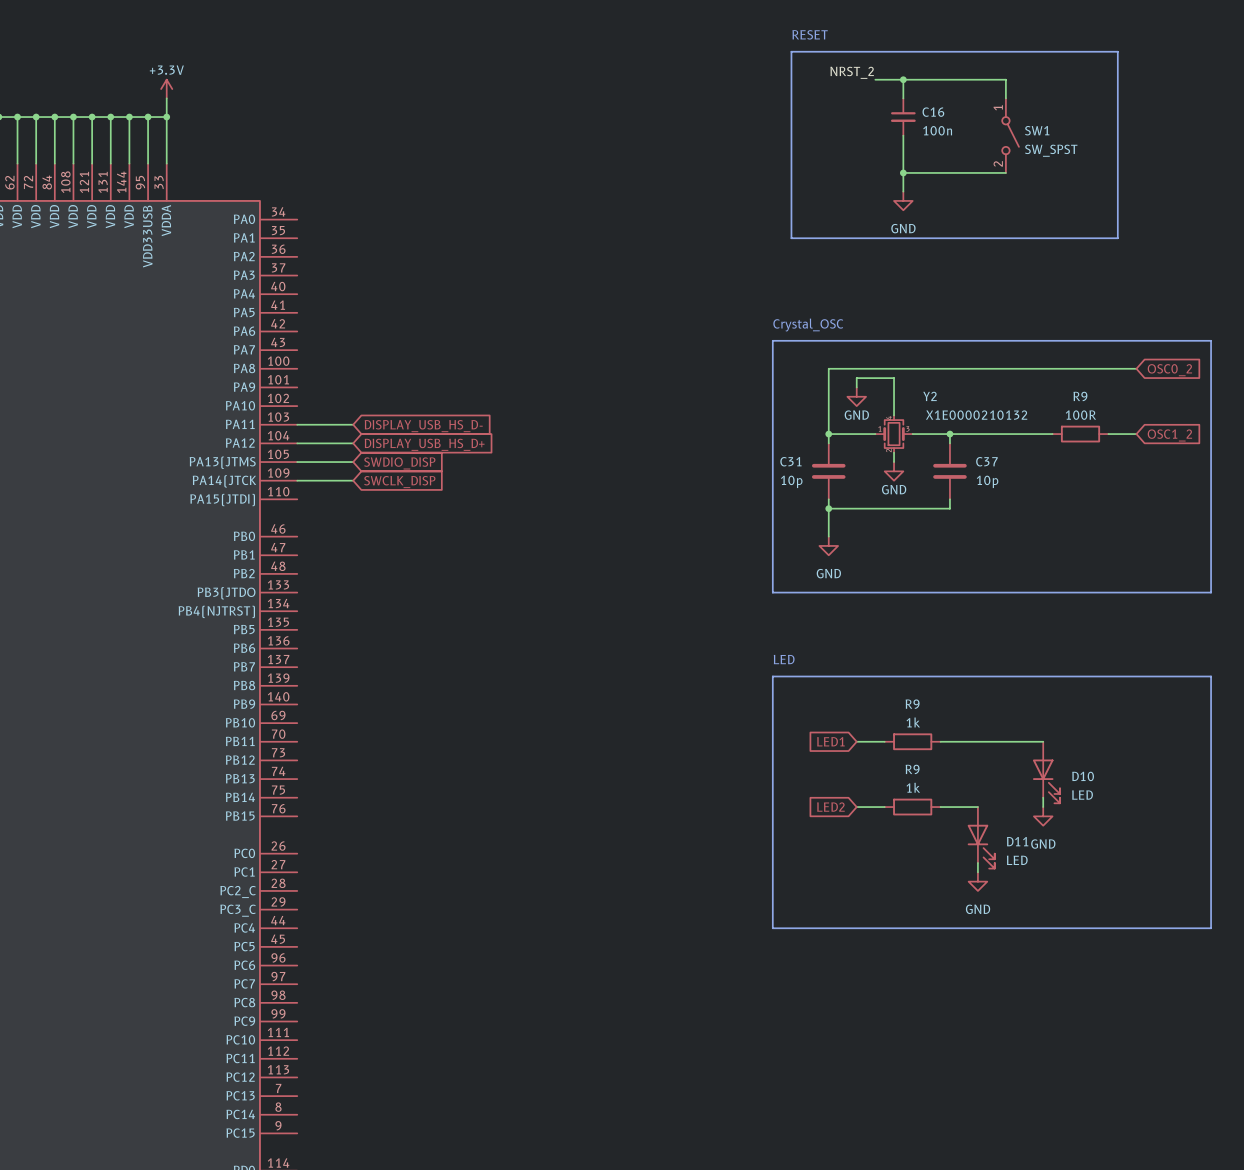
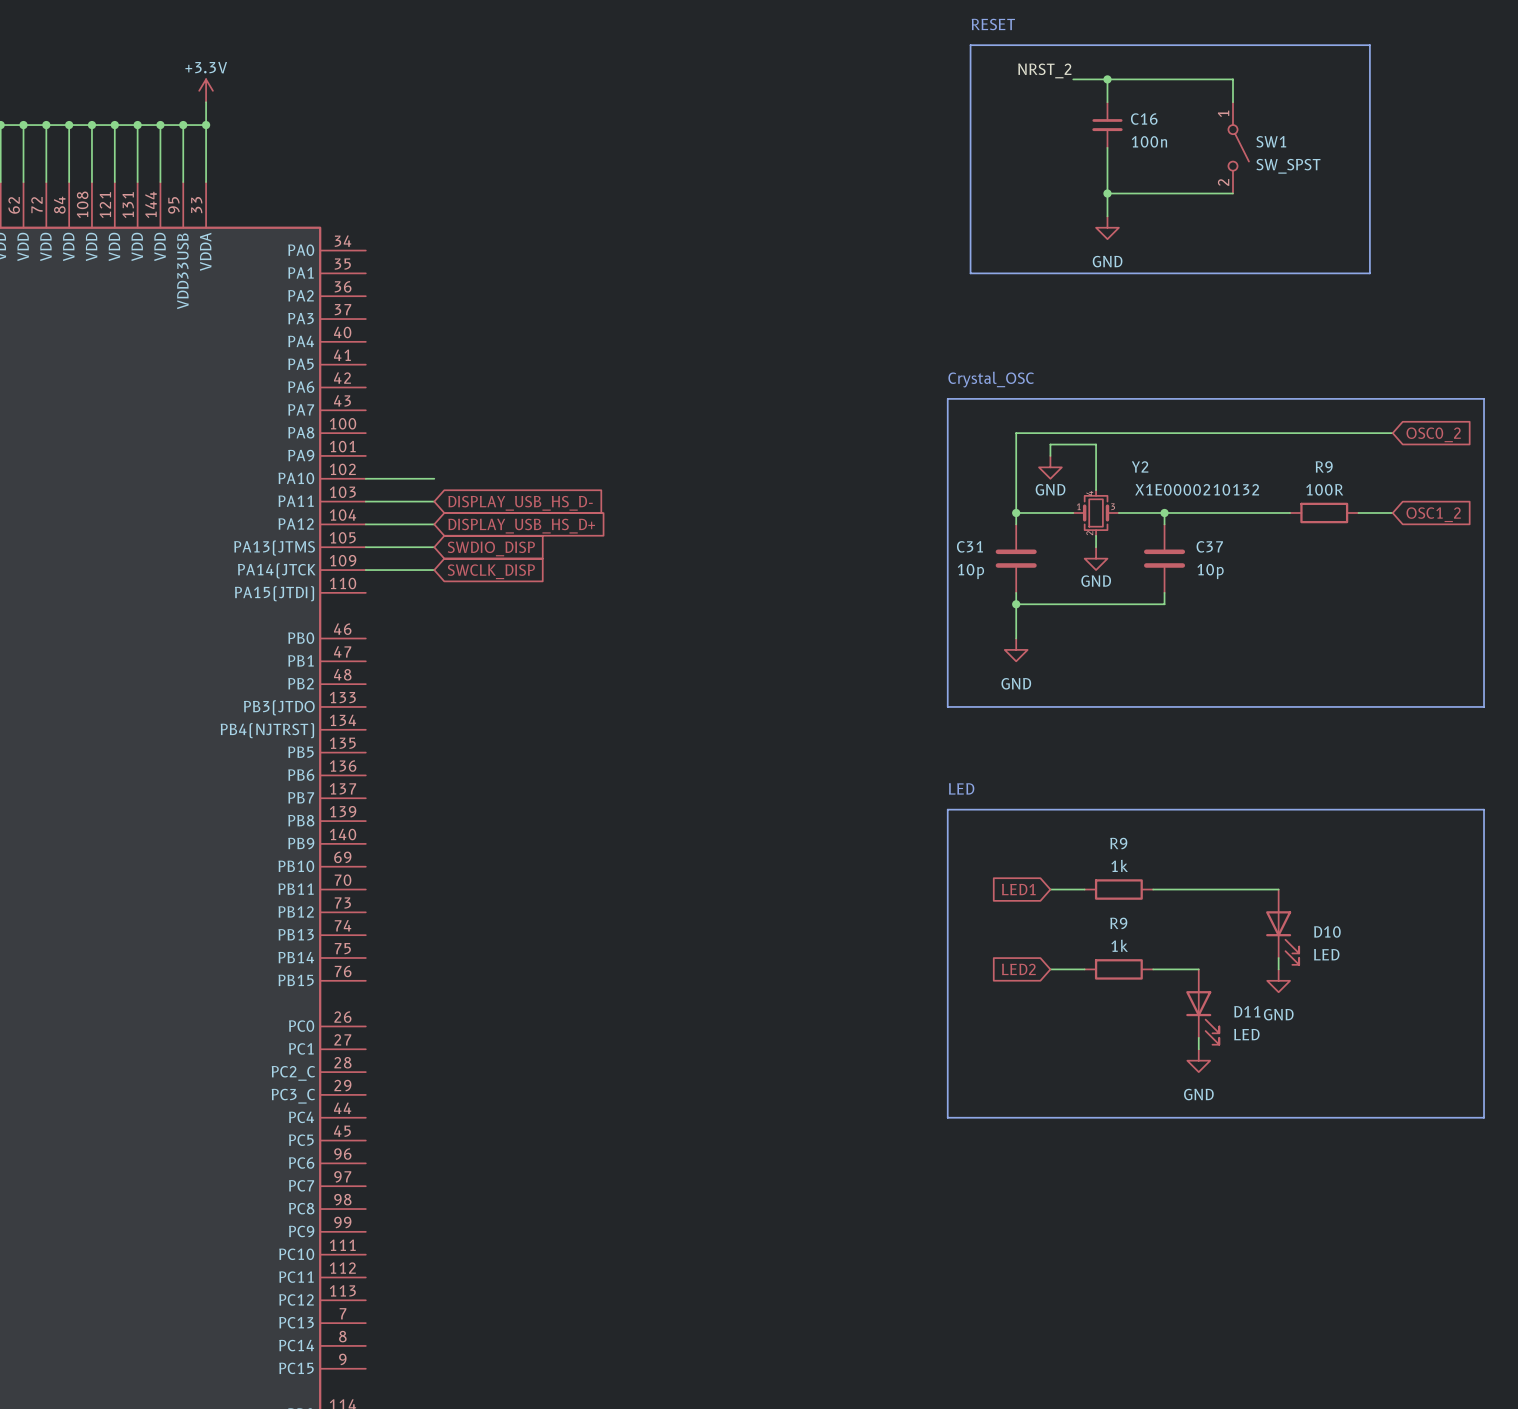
wire: none -> (365, 478) (434, 478)

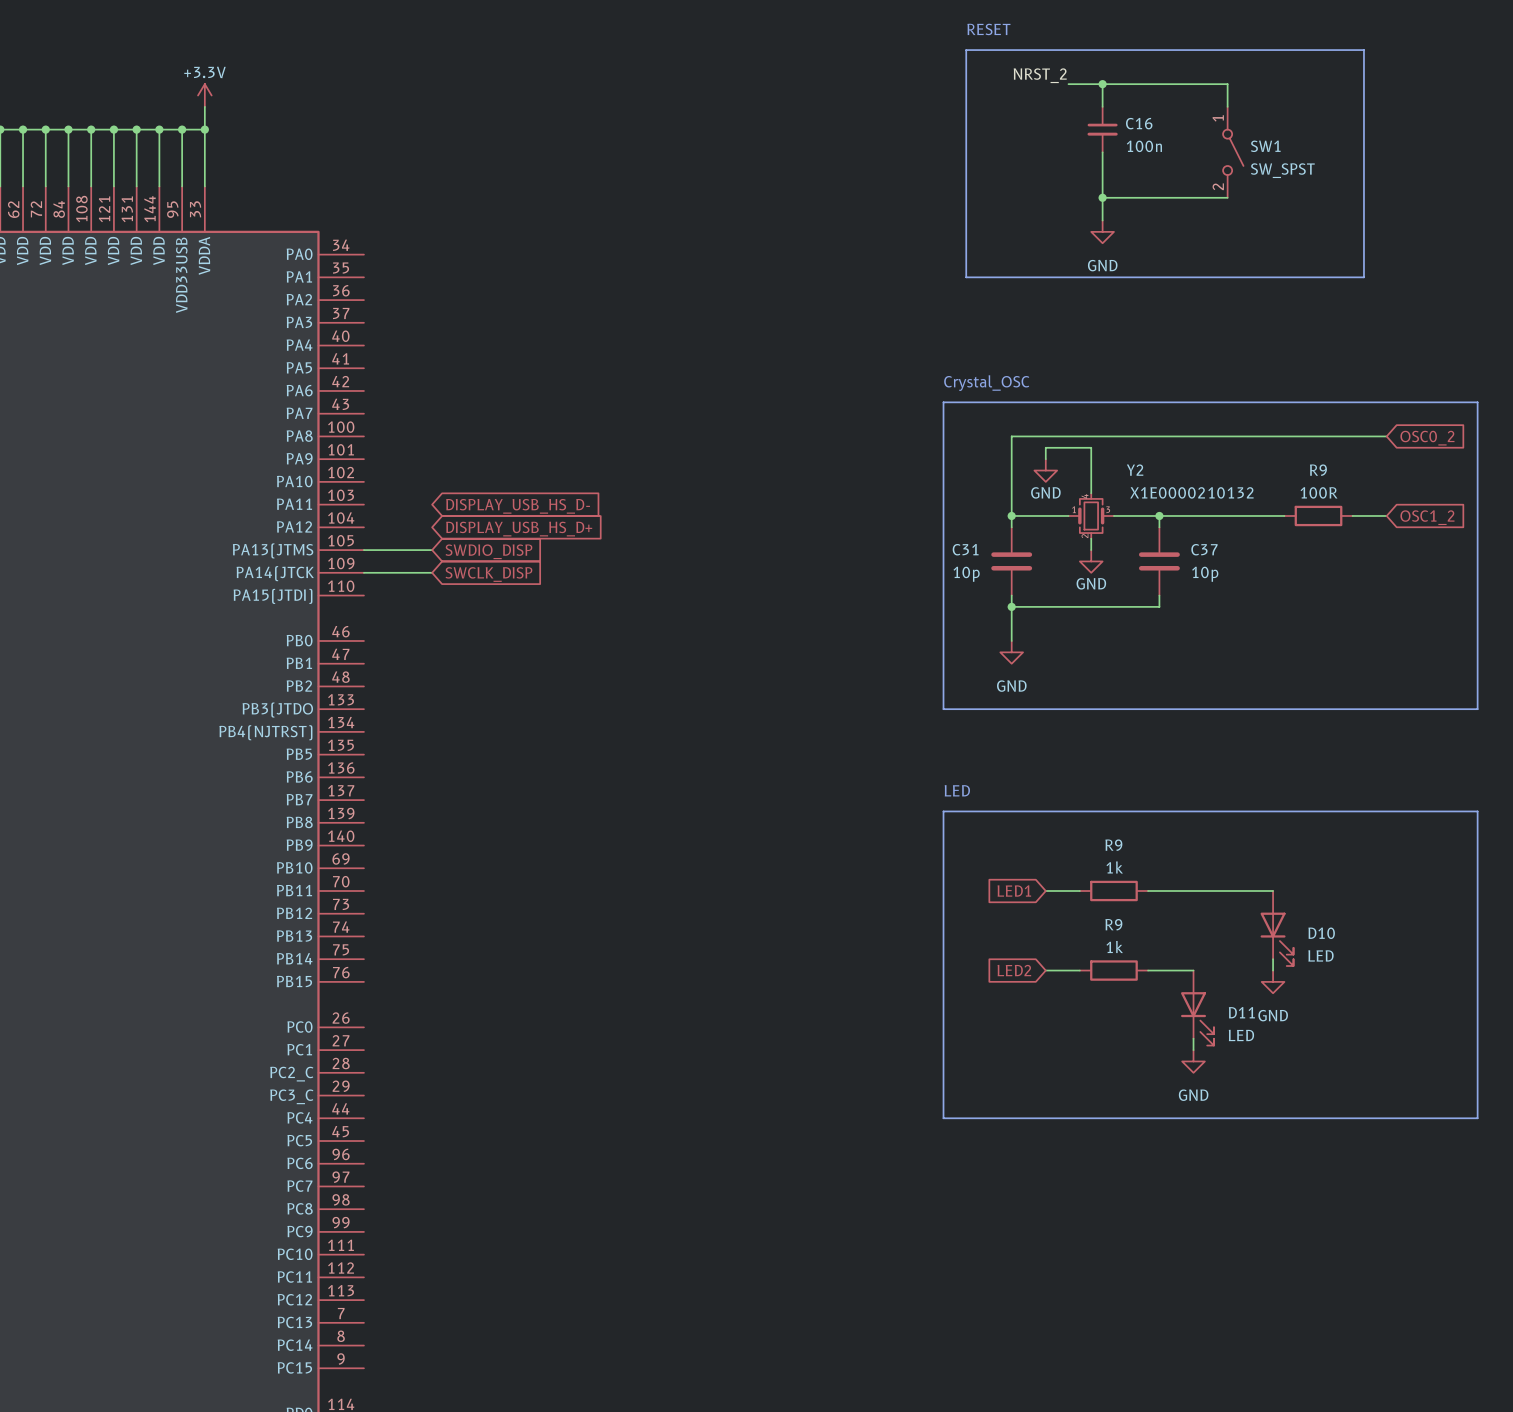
wire: (365, 478) (434, 478) -> none
wire: (365, 501) (434, 501) -> none
wire: (365, 524) (434, 524) -> none

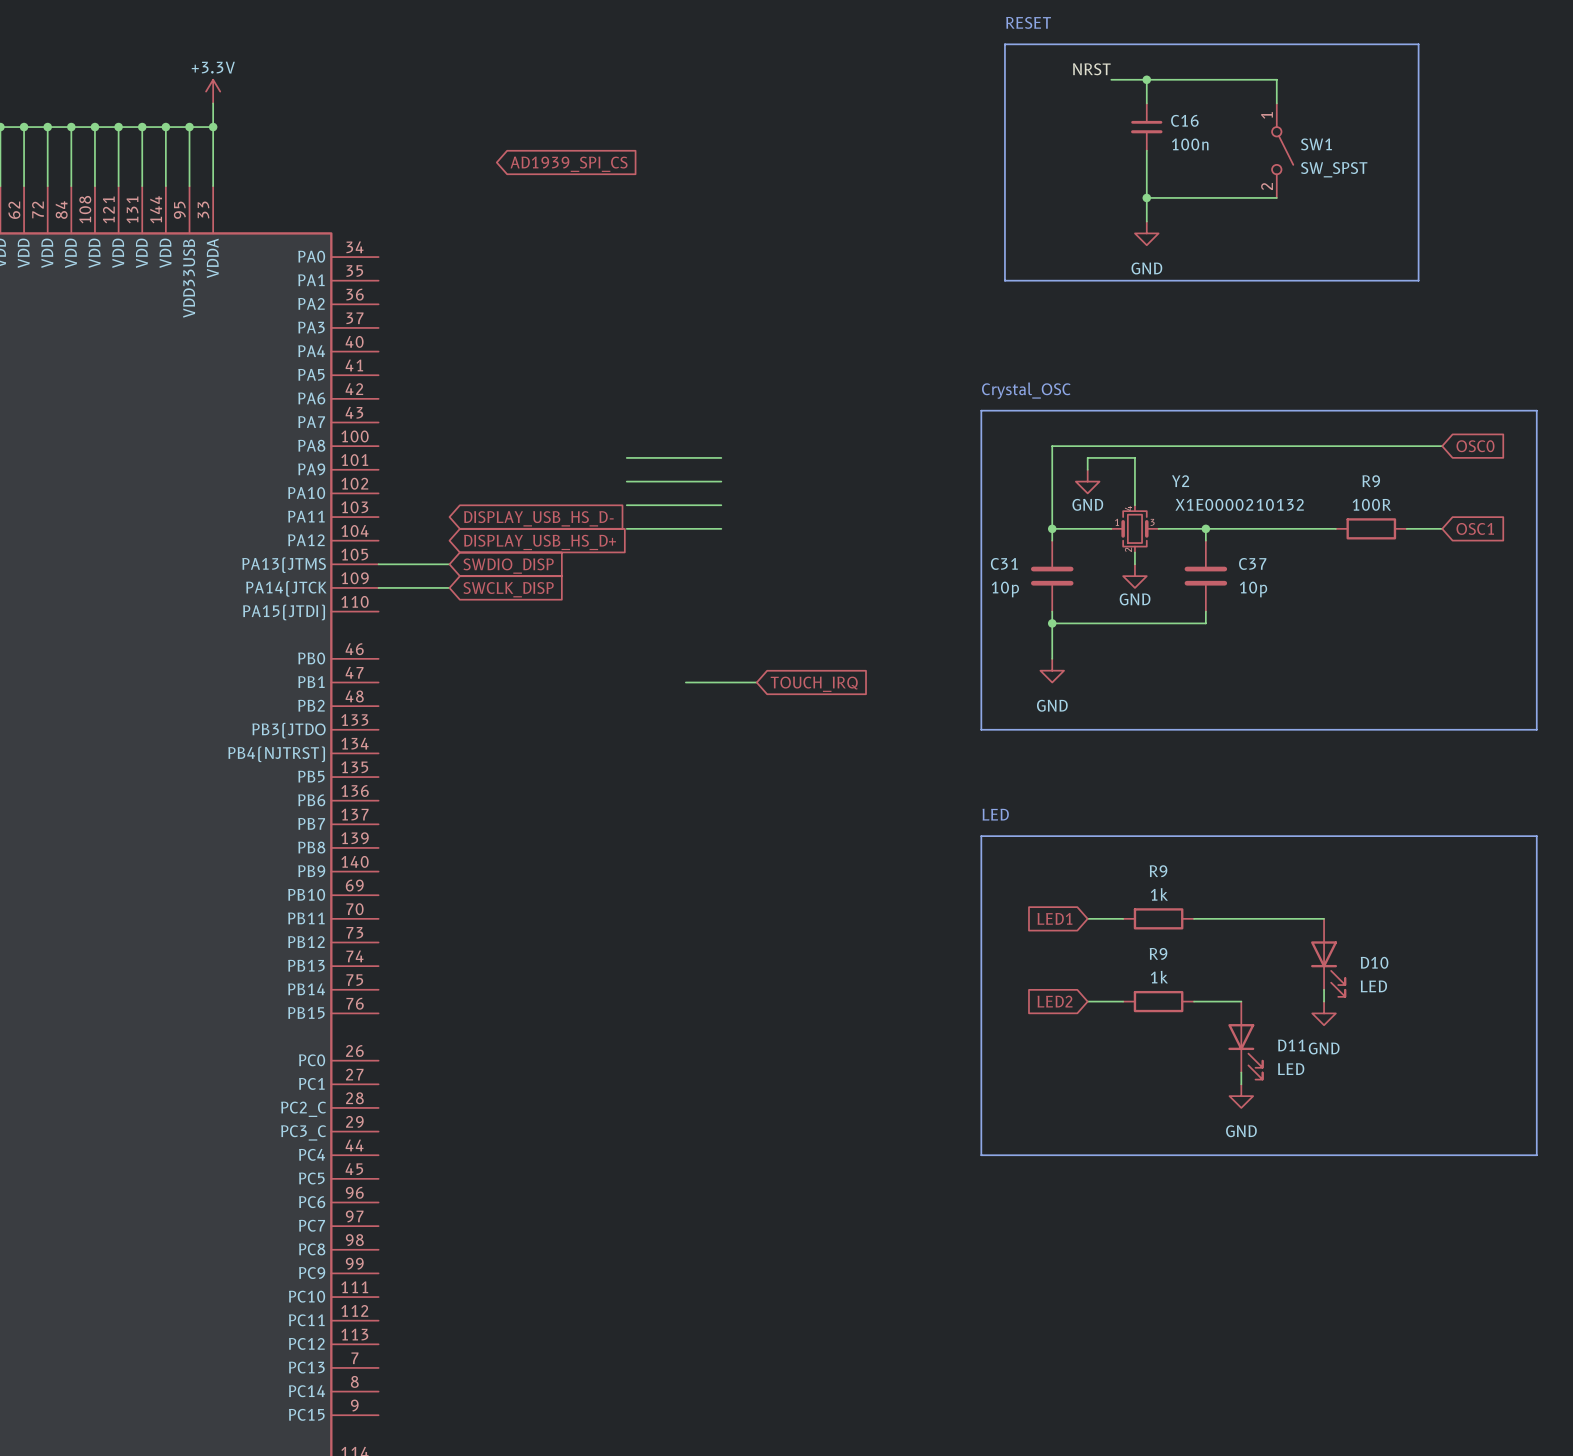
label: NRST_2 (1040, 75) -> NRST (1091, 69)
global label: none -> AD1939_SPI_CS (569, 164)
global label: OSC0_2 (1427, 438) -> OSC0 (1475, 446)
wire: none -> (626, 457) (721, 457)
wire: none -> (626, 481) (721, 481)
wire: none -> (626, 505) (721, 505)
wire: none -> (626, 528) (721, 528)
global label: OSC1_2 (1427, 517) -> OSC1 (1475, 528)
wire: none -> (685, 682) (756, 682)
global label: none -> TOUCH_IRQ (814, 684)

